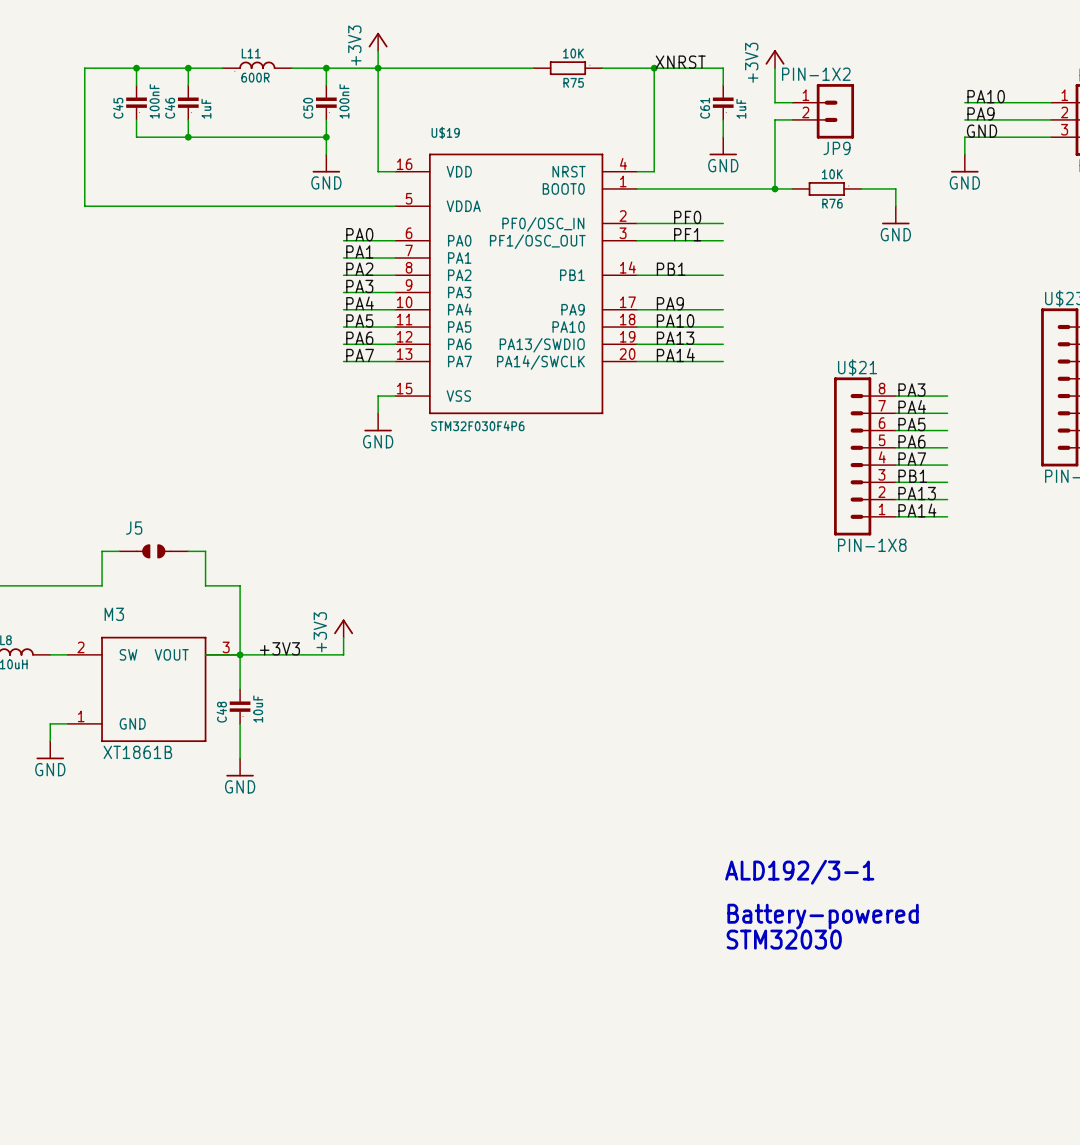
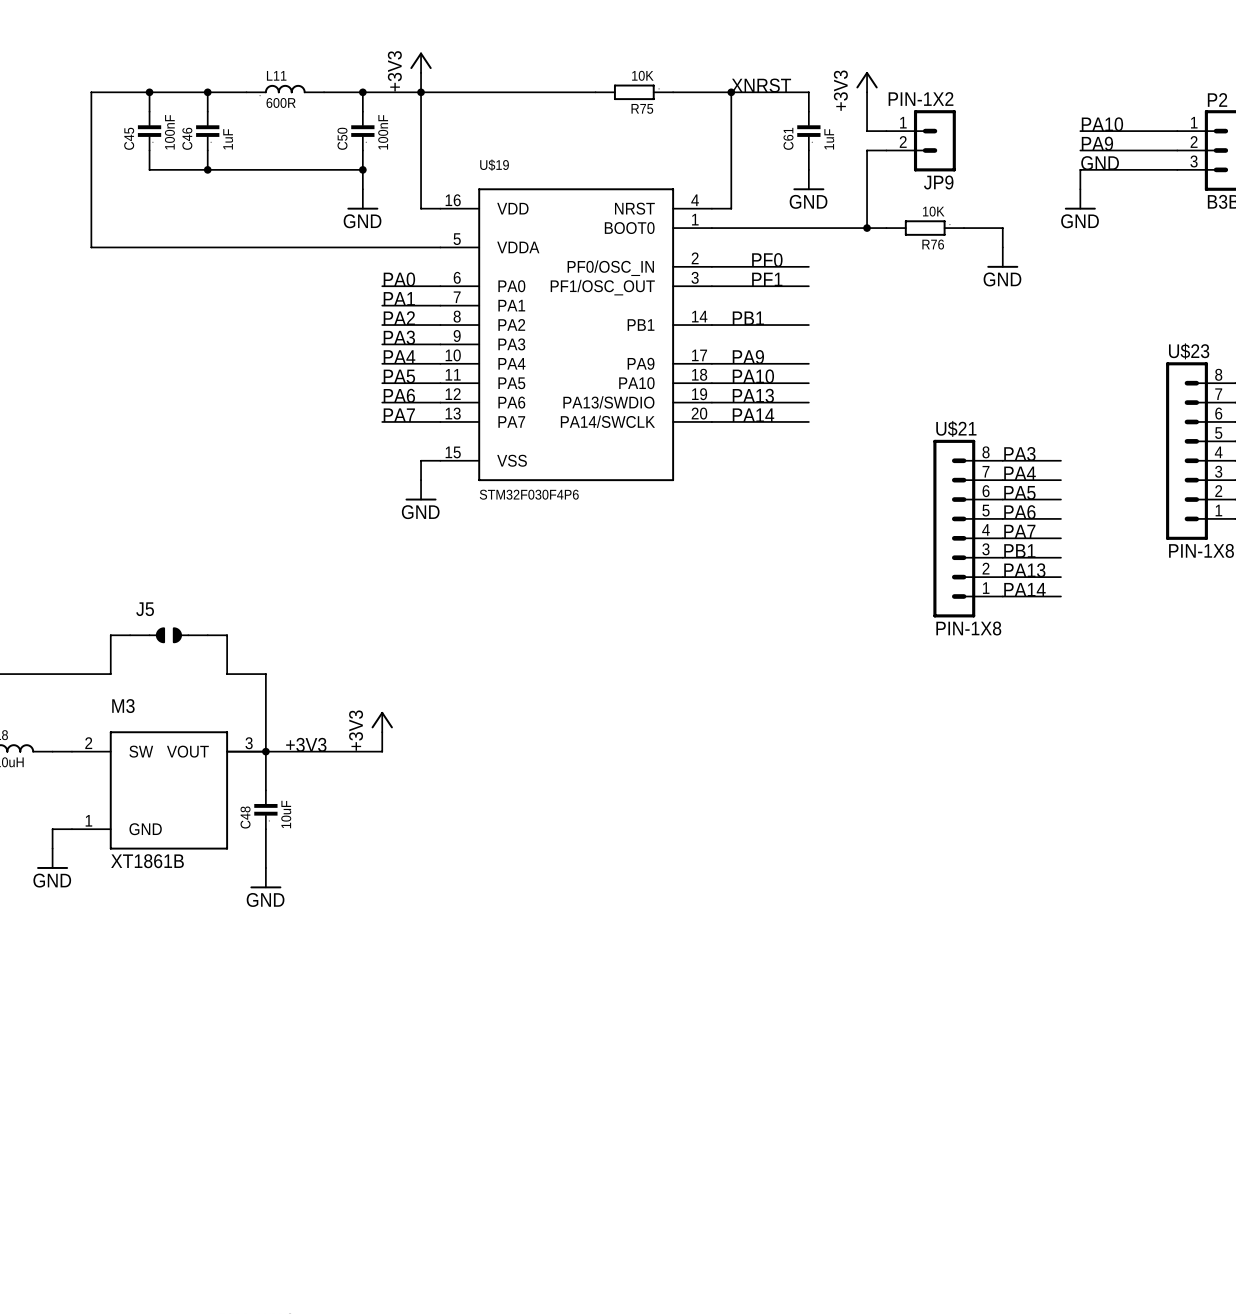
text: ALD192/3-1 (799, 872) -> none
text: Battery-powered (823, 916) -> none
text: STM32030 (784, 939) -> none

